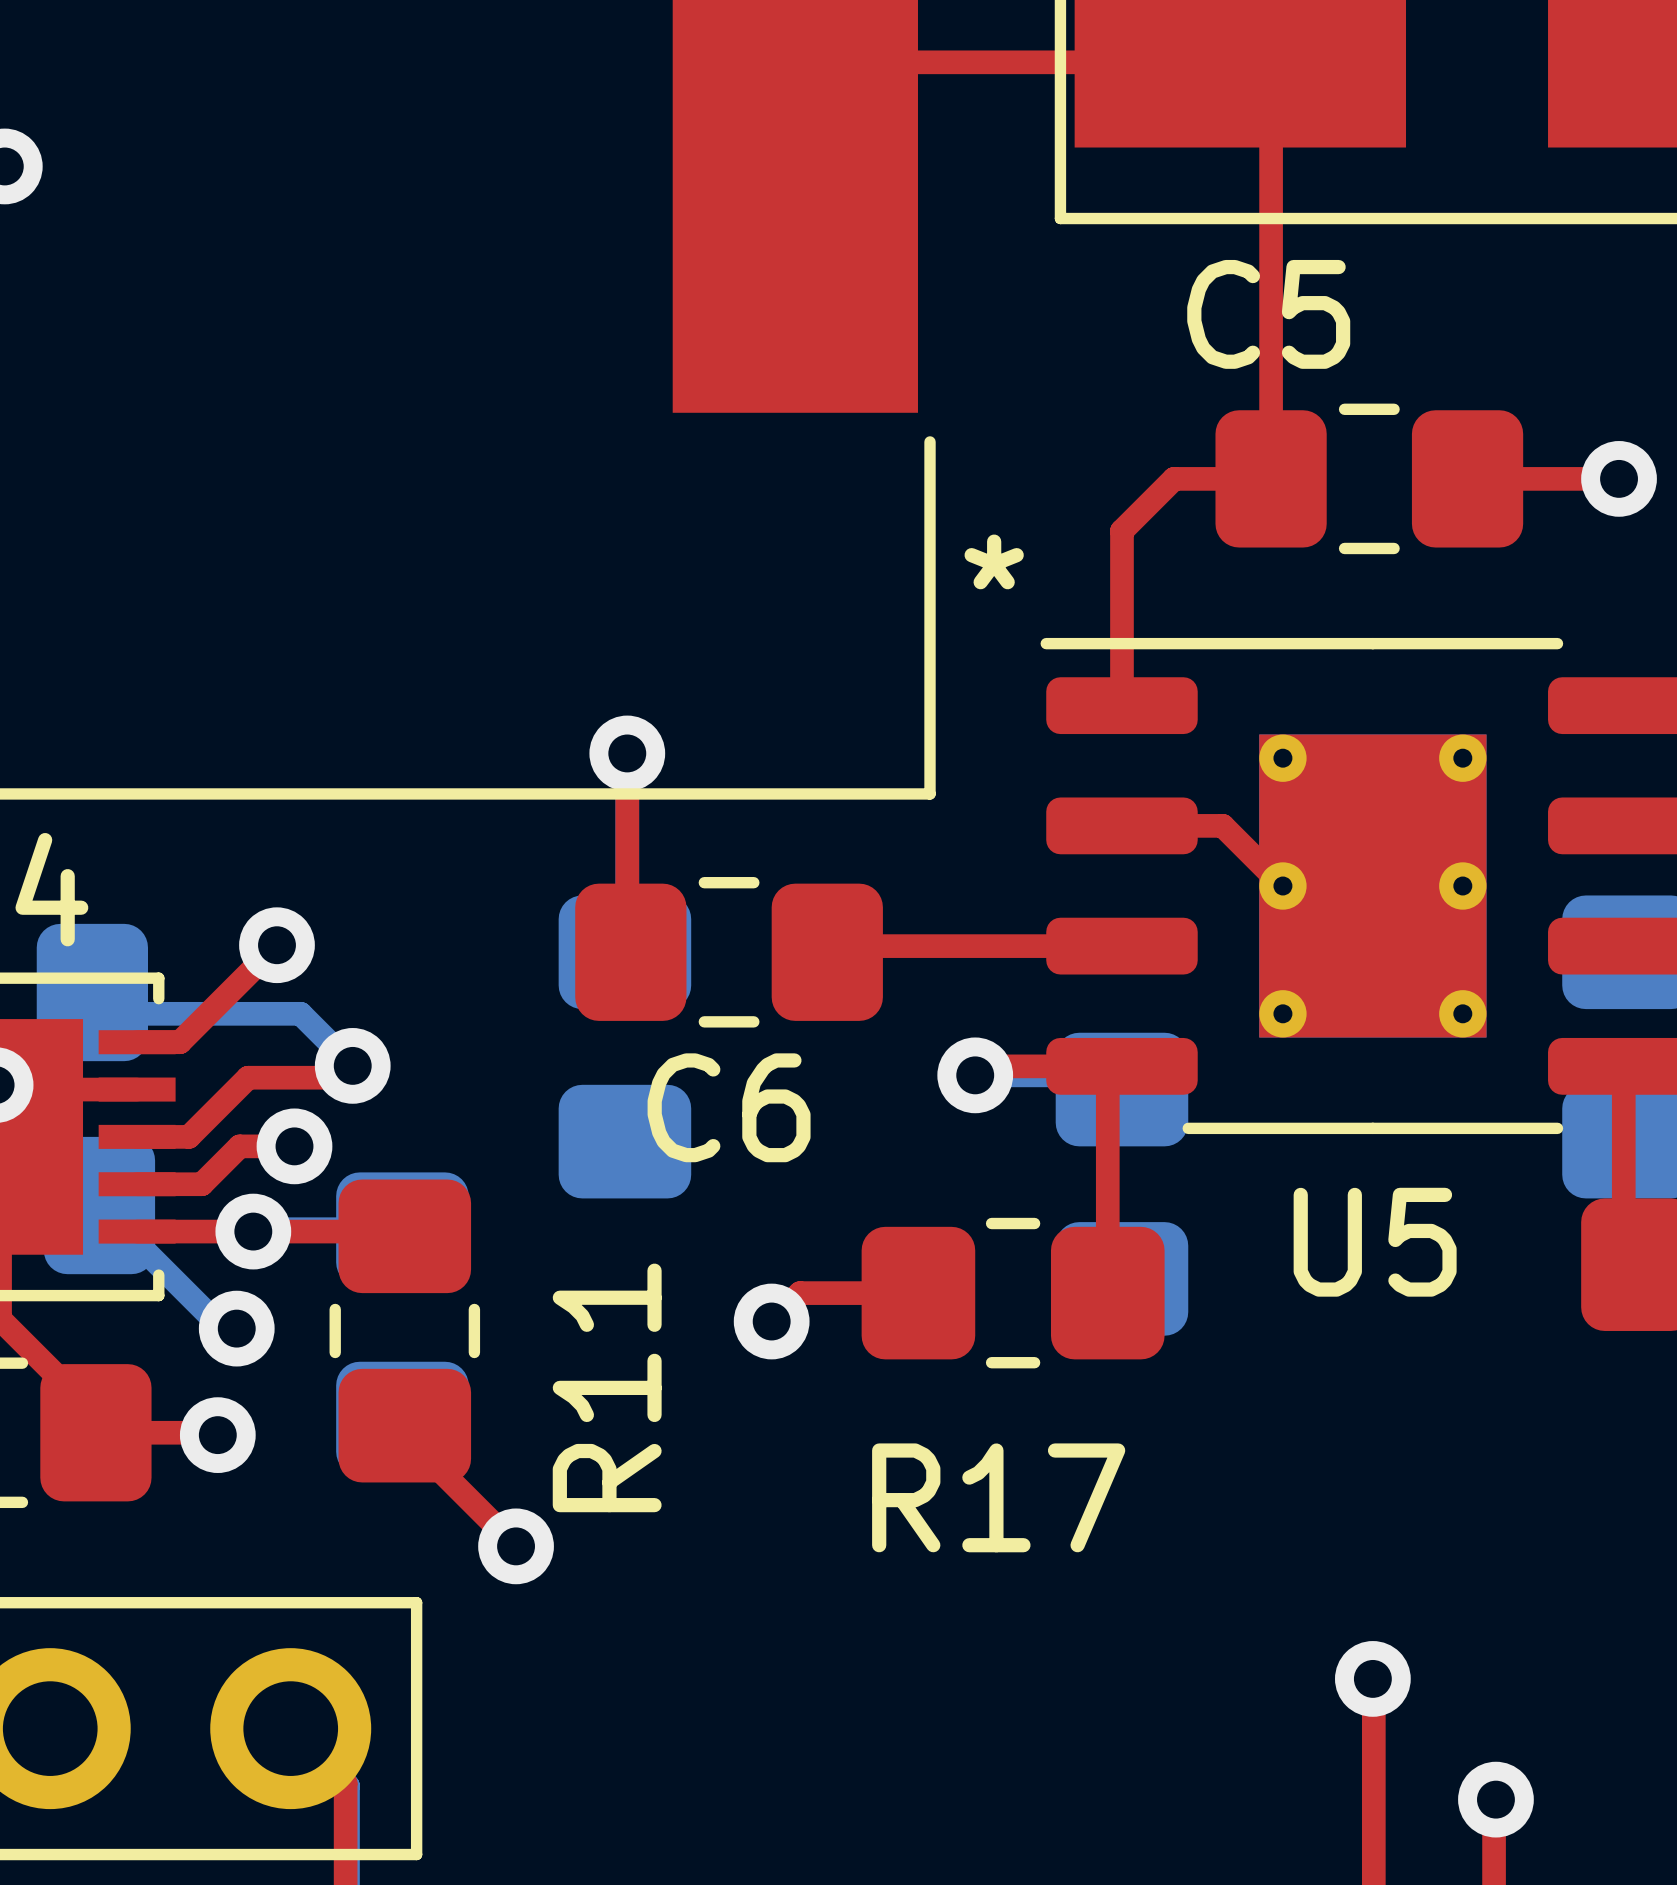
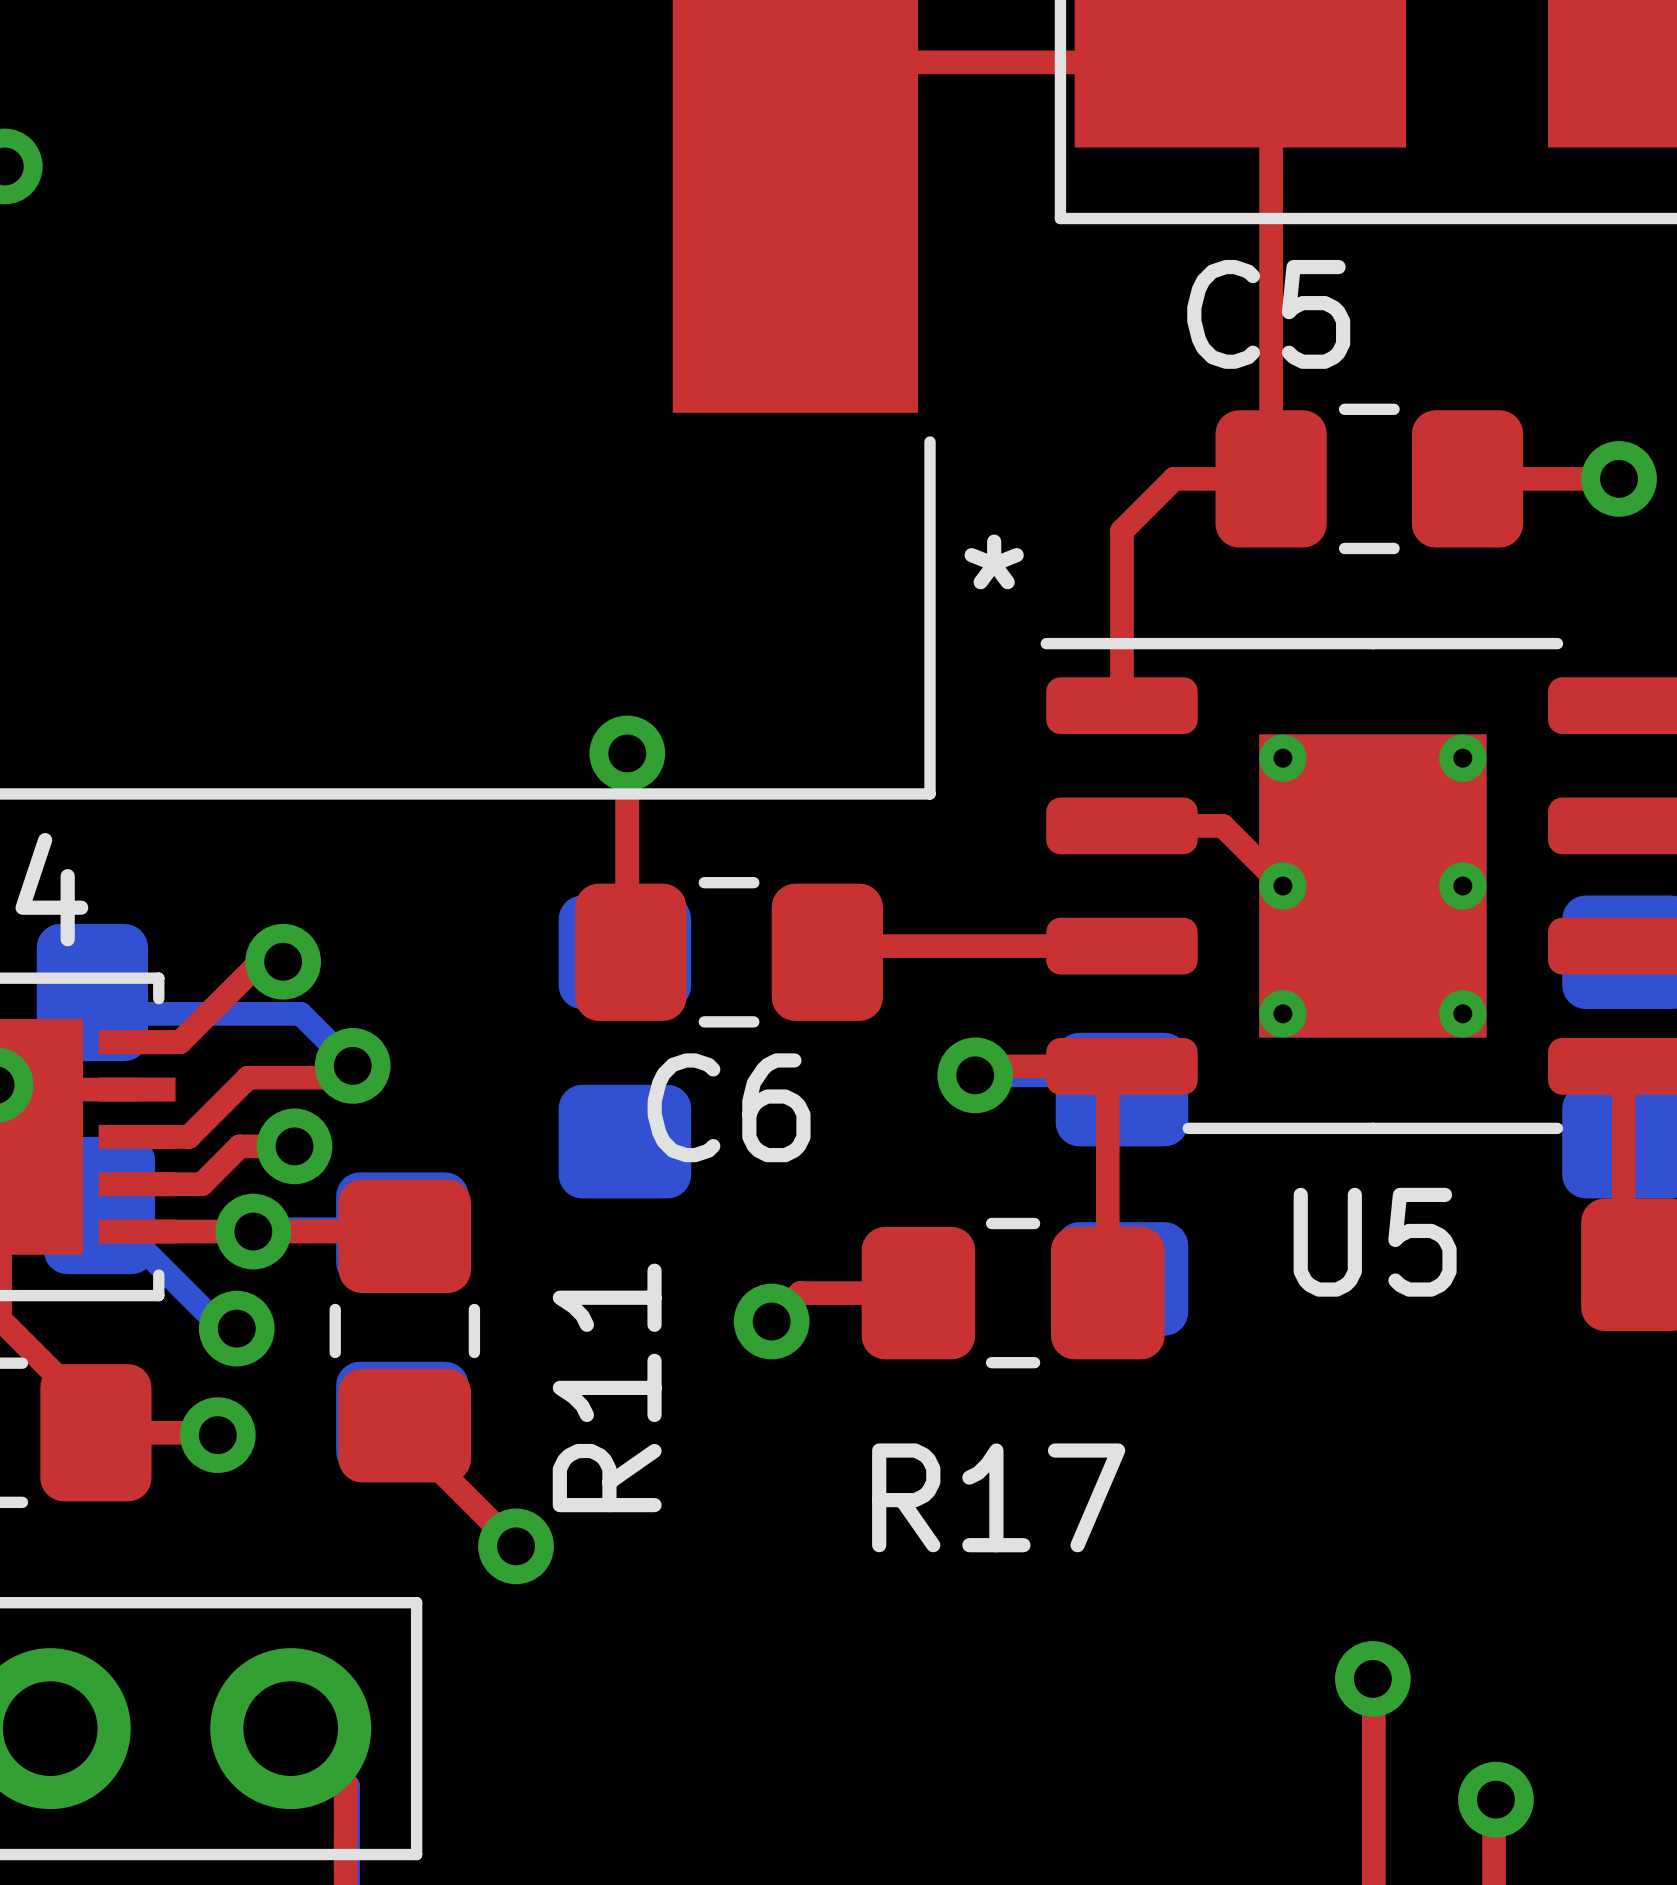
via position: (276, 945) -> (283, 961)

